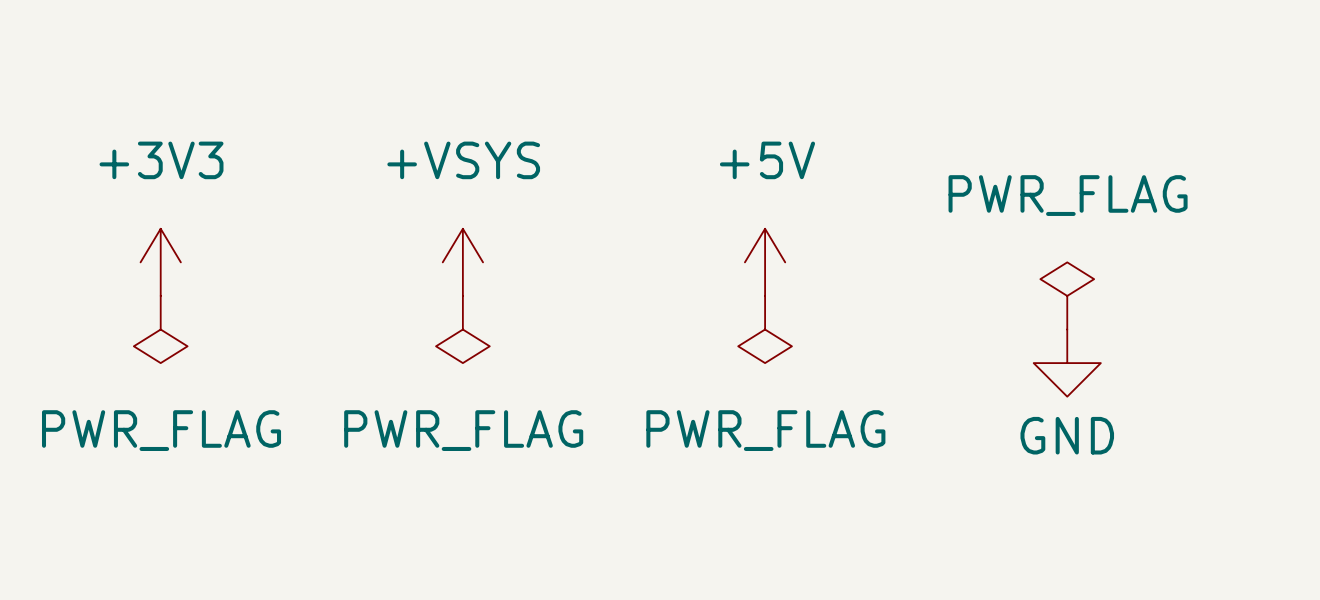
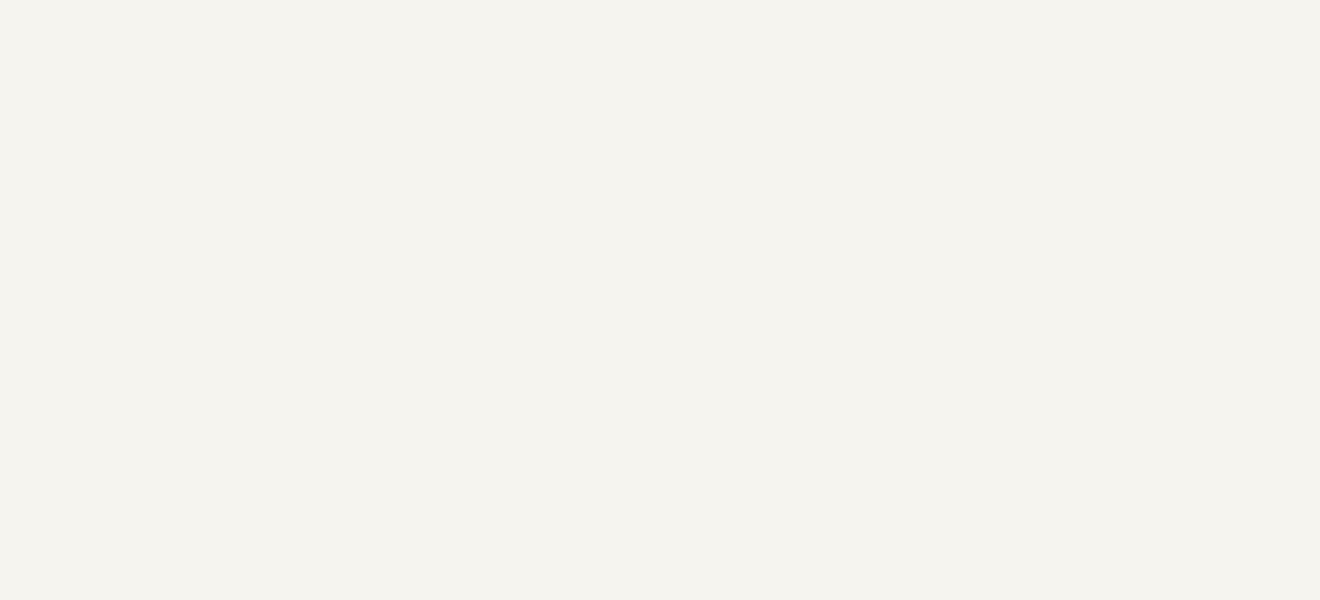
power symbol: +3V3 (160, 262) -> none
power symbol: +VSYS (462, 262) -> none
power symbol: +5V (765, 262) -> none
power symbol: PWR_FLAG (1067, 295) -> none
power symbol: PWR_FLAG (160, 329) -> none
power symbol: PWR_FLAG (462, 329) -> none
power symbol: PWR_FLAG (765, 329) -> none
power symbol: GND (1067, 363) -> none

